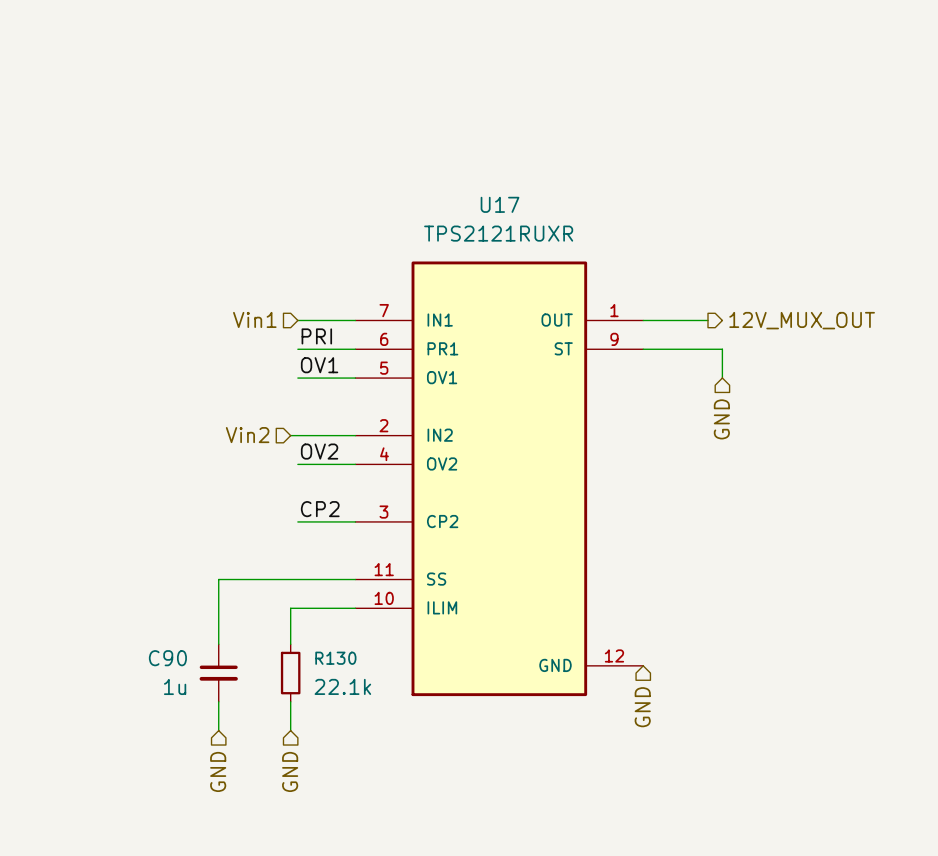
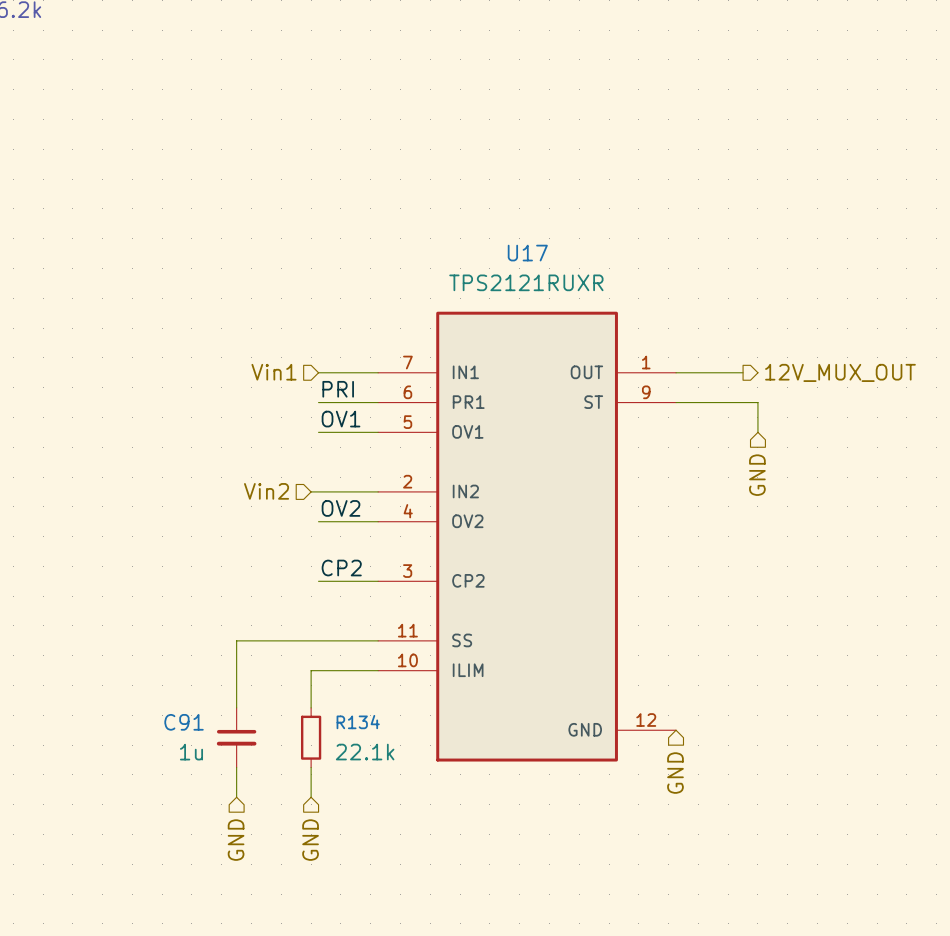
C90 name: C90 (167, 658) -> C91 (184, 722)
R130 name: R130 (335, 658) -> R134 (358, 722)

